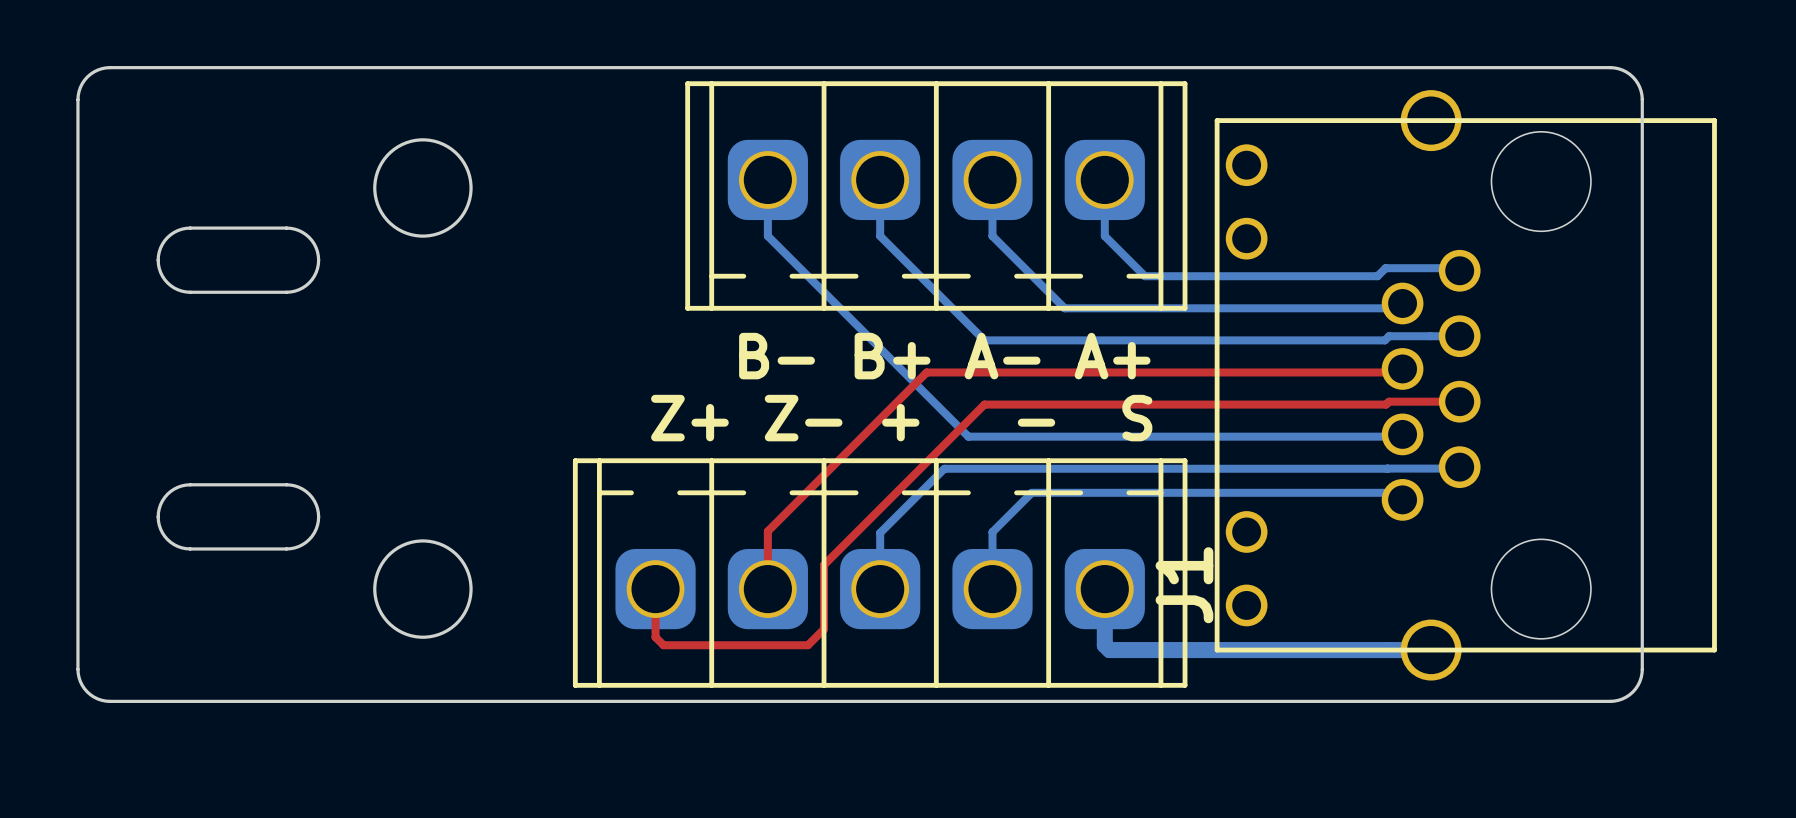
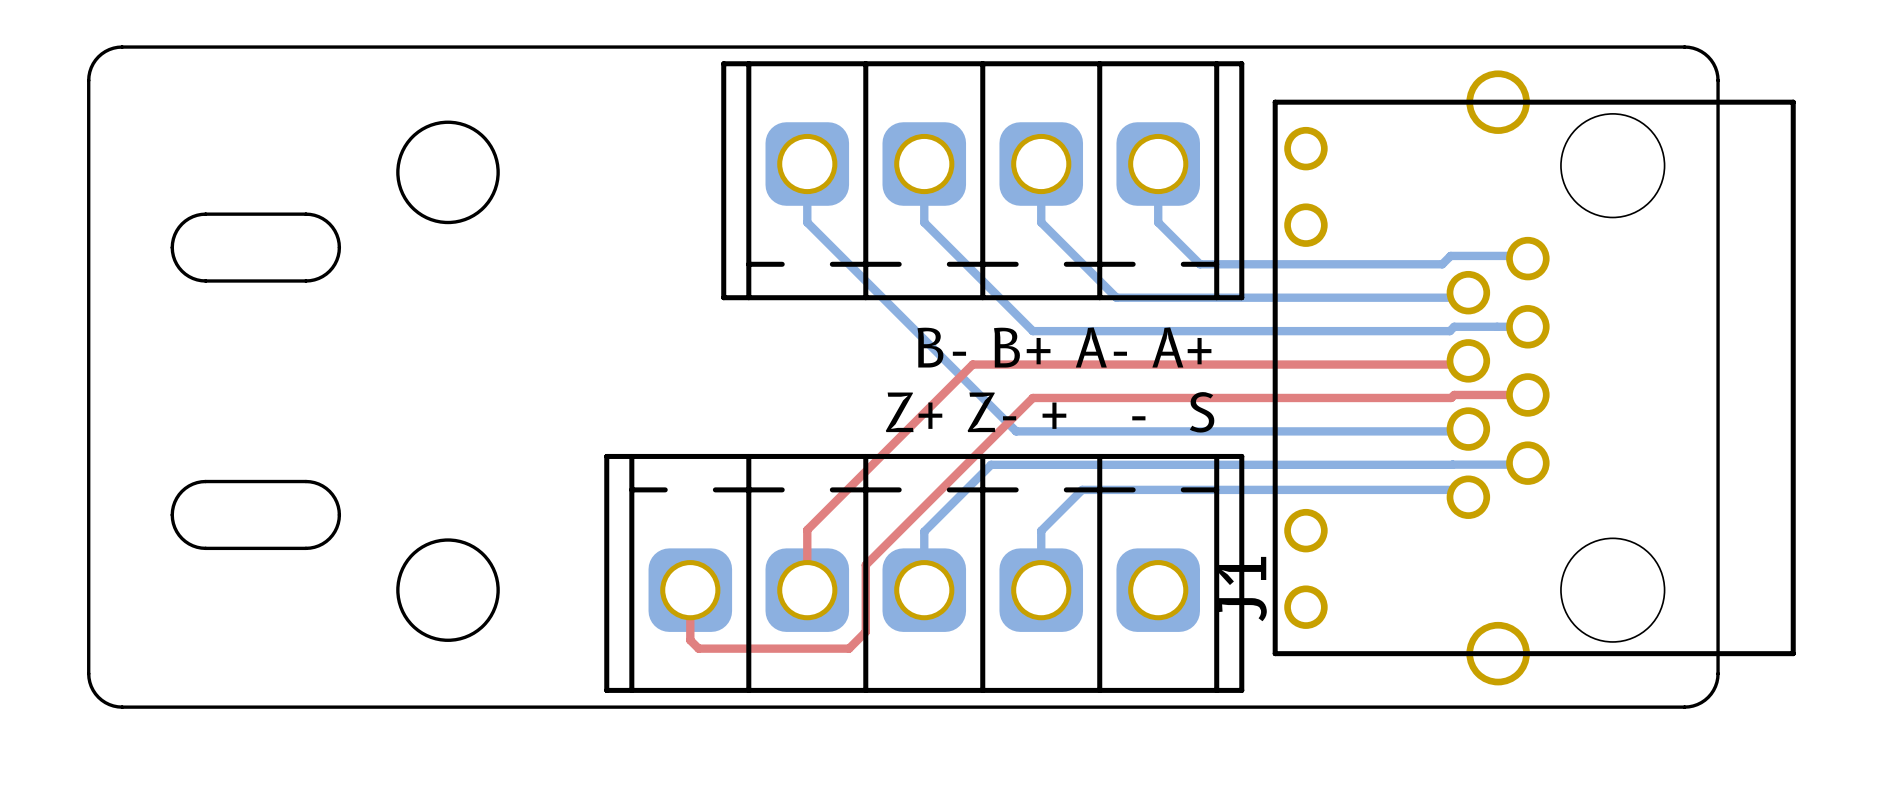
bottom track: (1104, 589) (1104, 645) (1109, 650) (1431, 650) -> none

